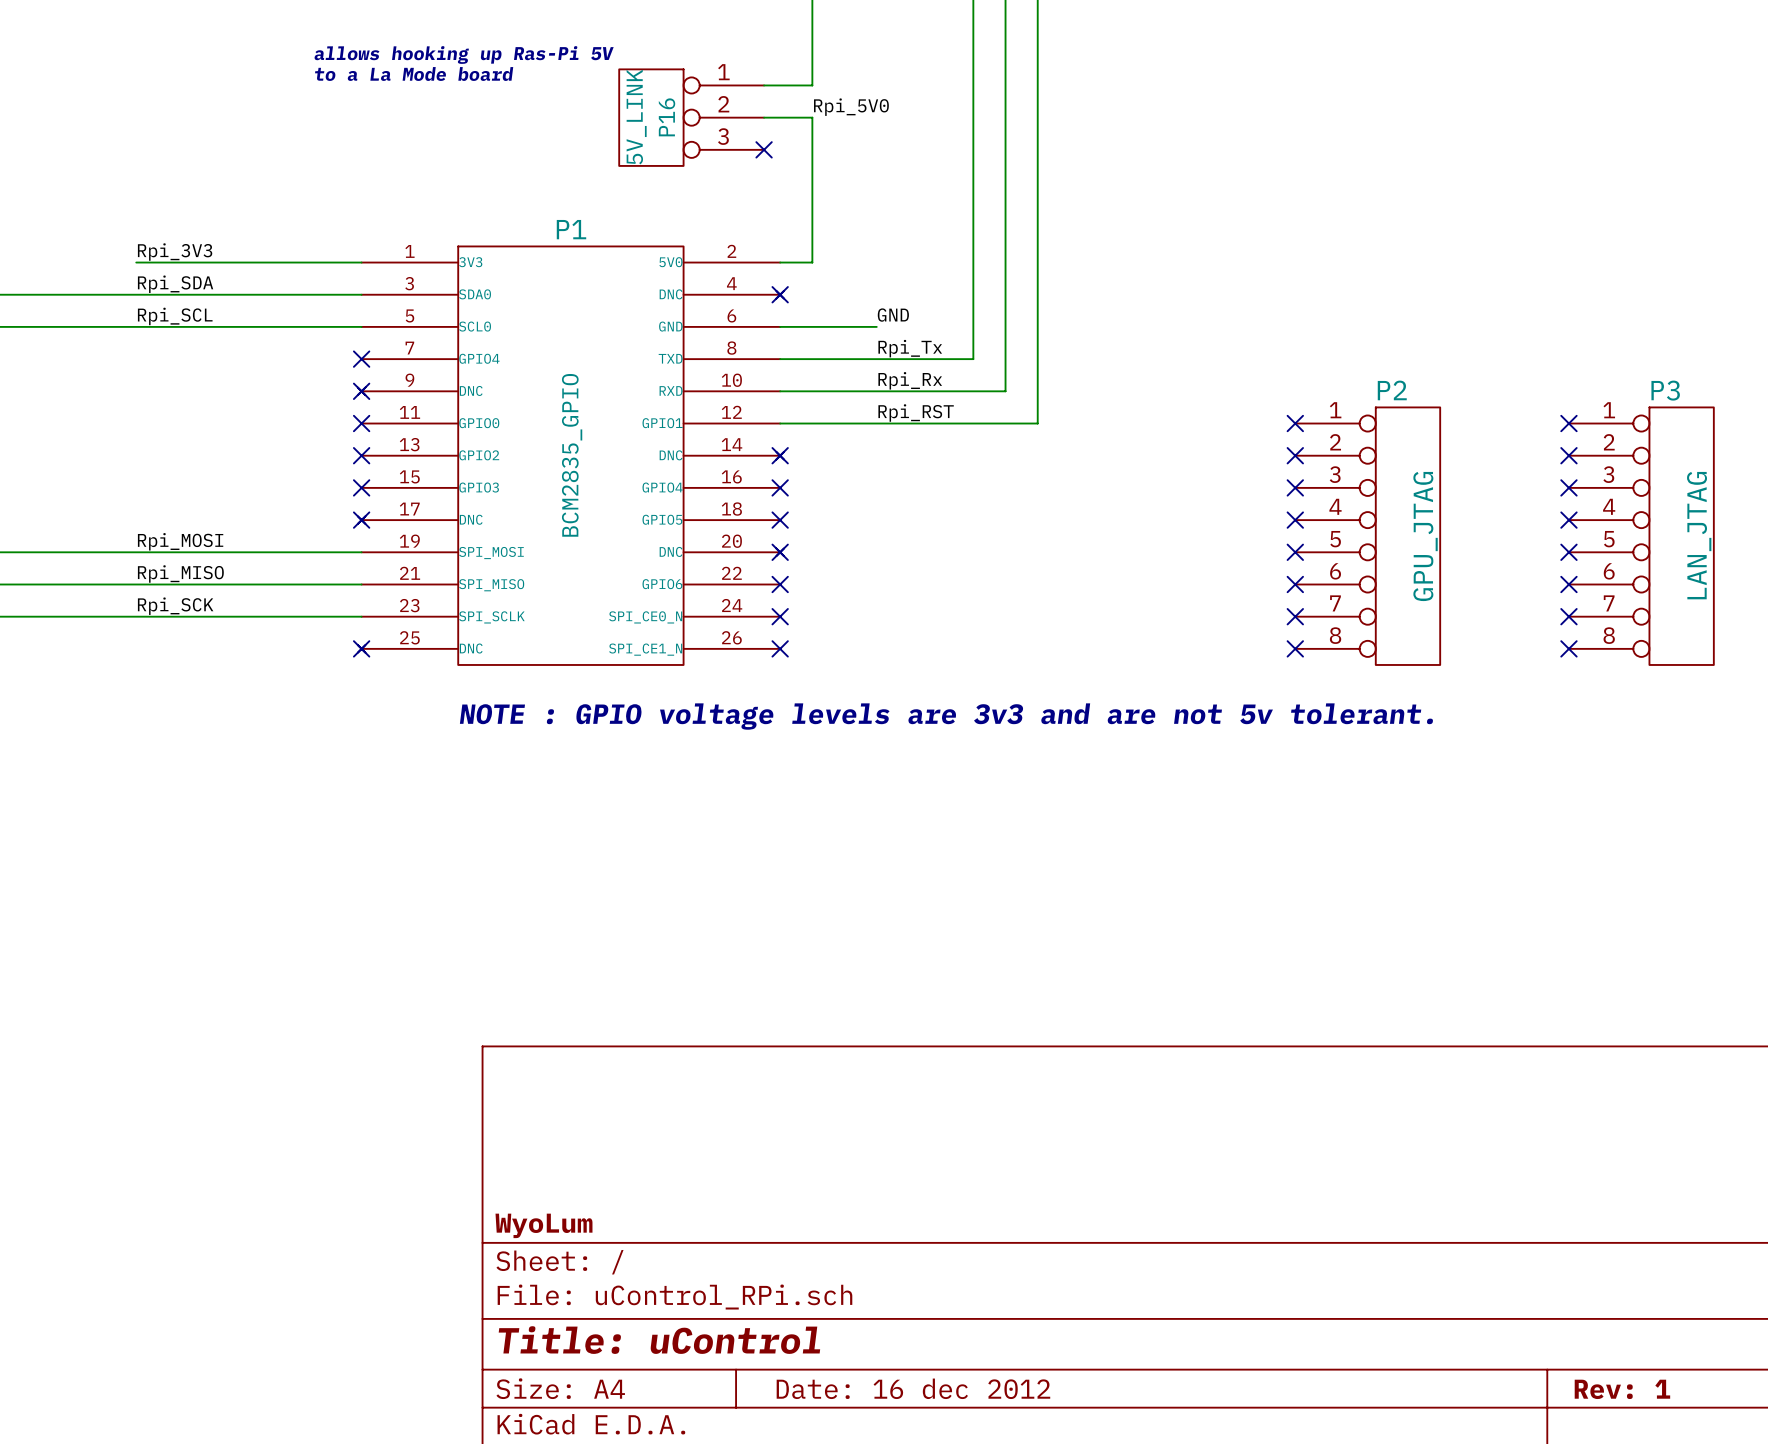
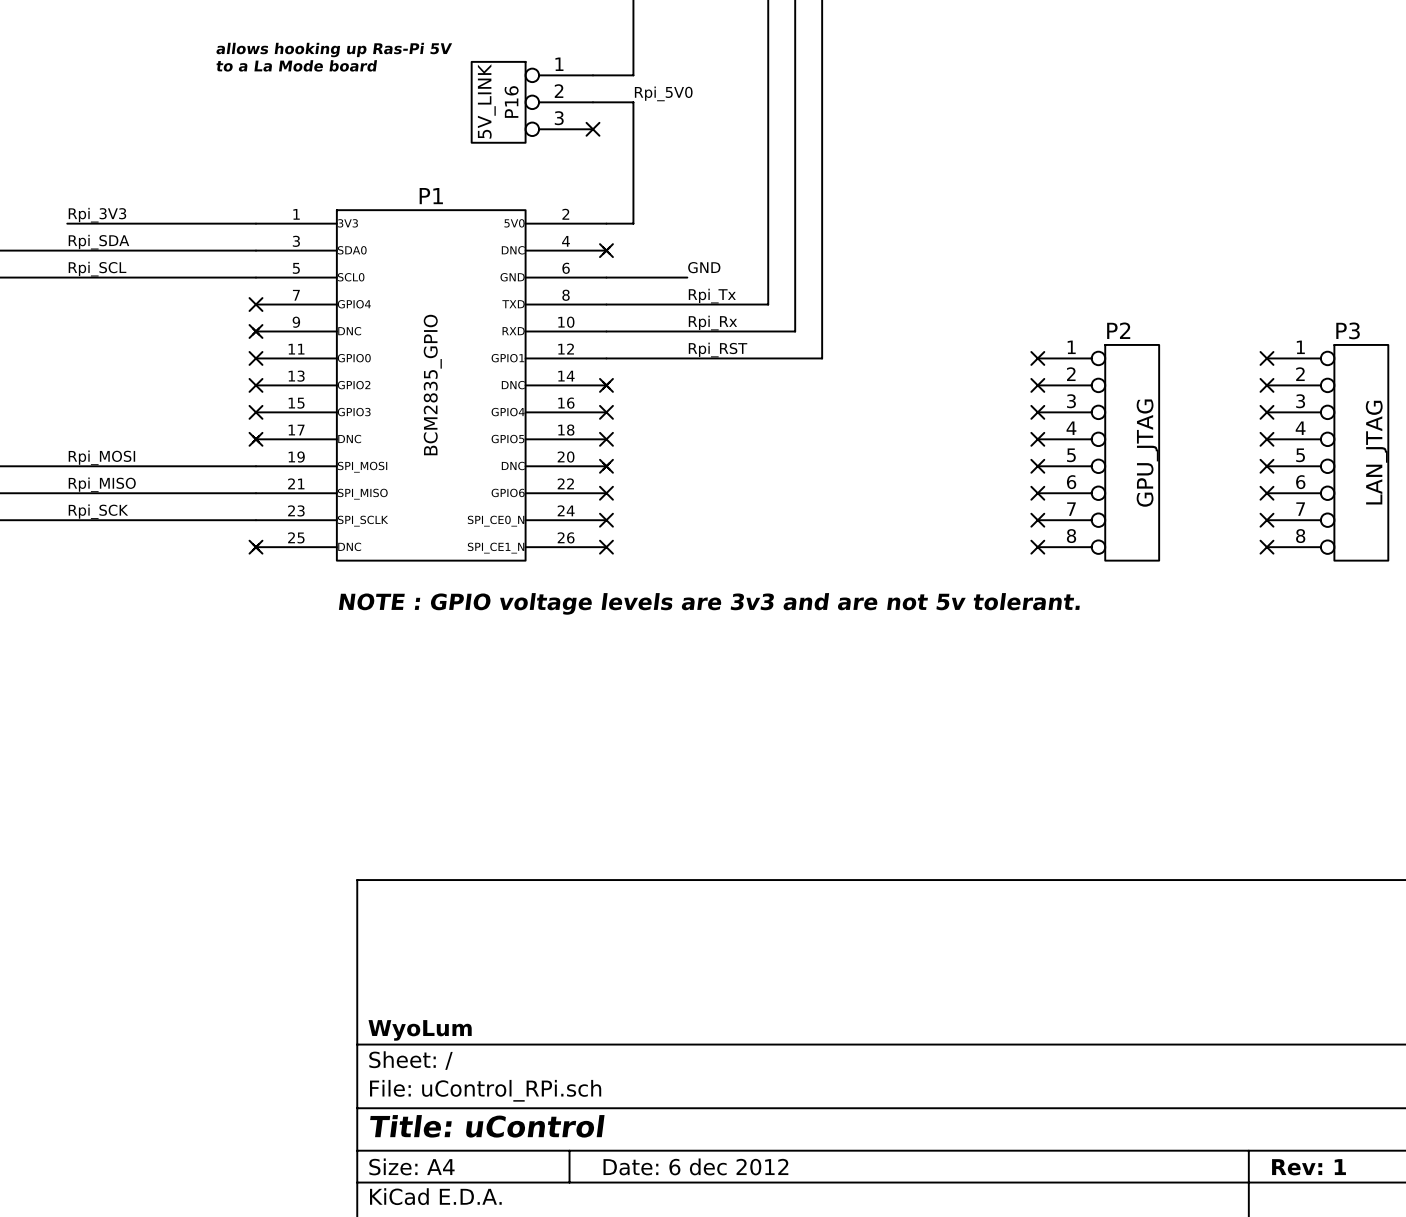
title block: Date: 16 dec 2012 (913, 1388) -> Date: 6 dec 2012 (695, 1166)

